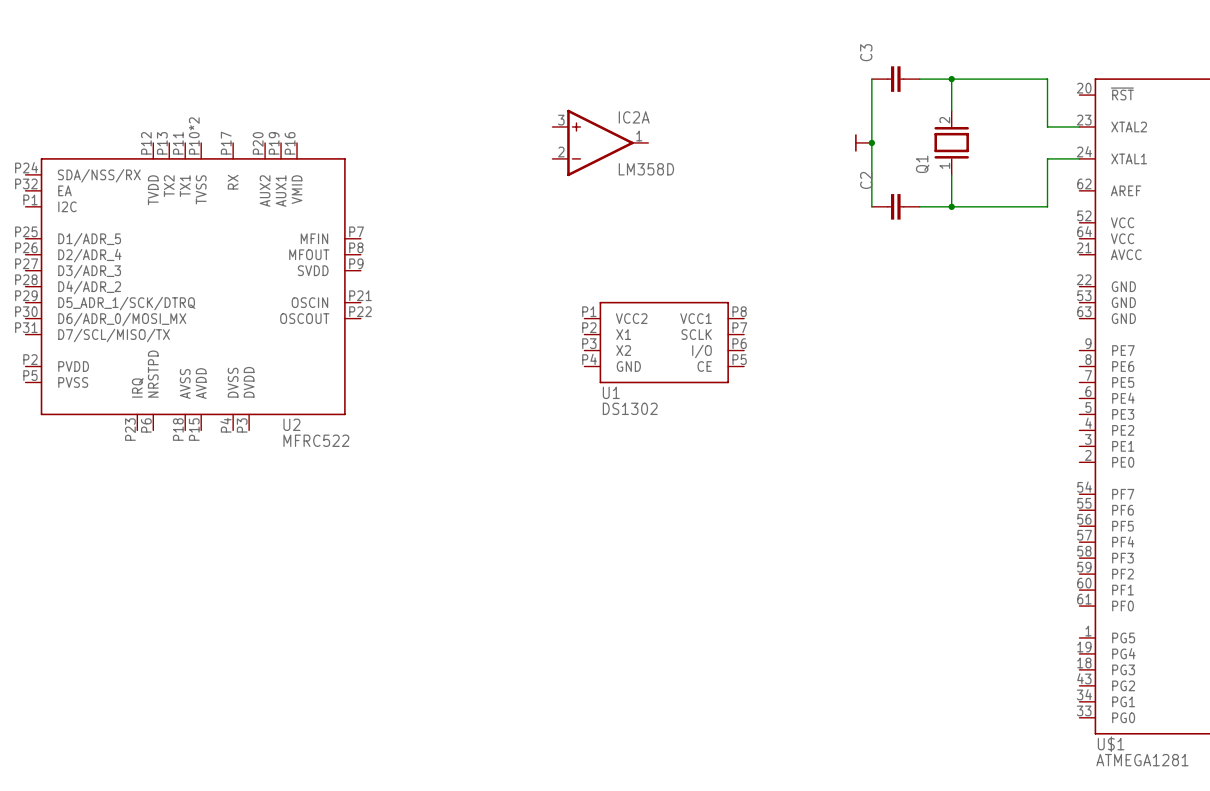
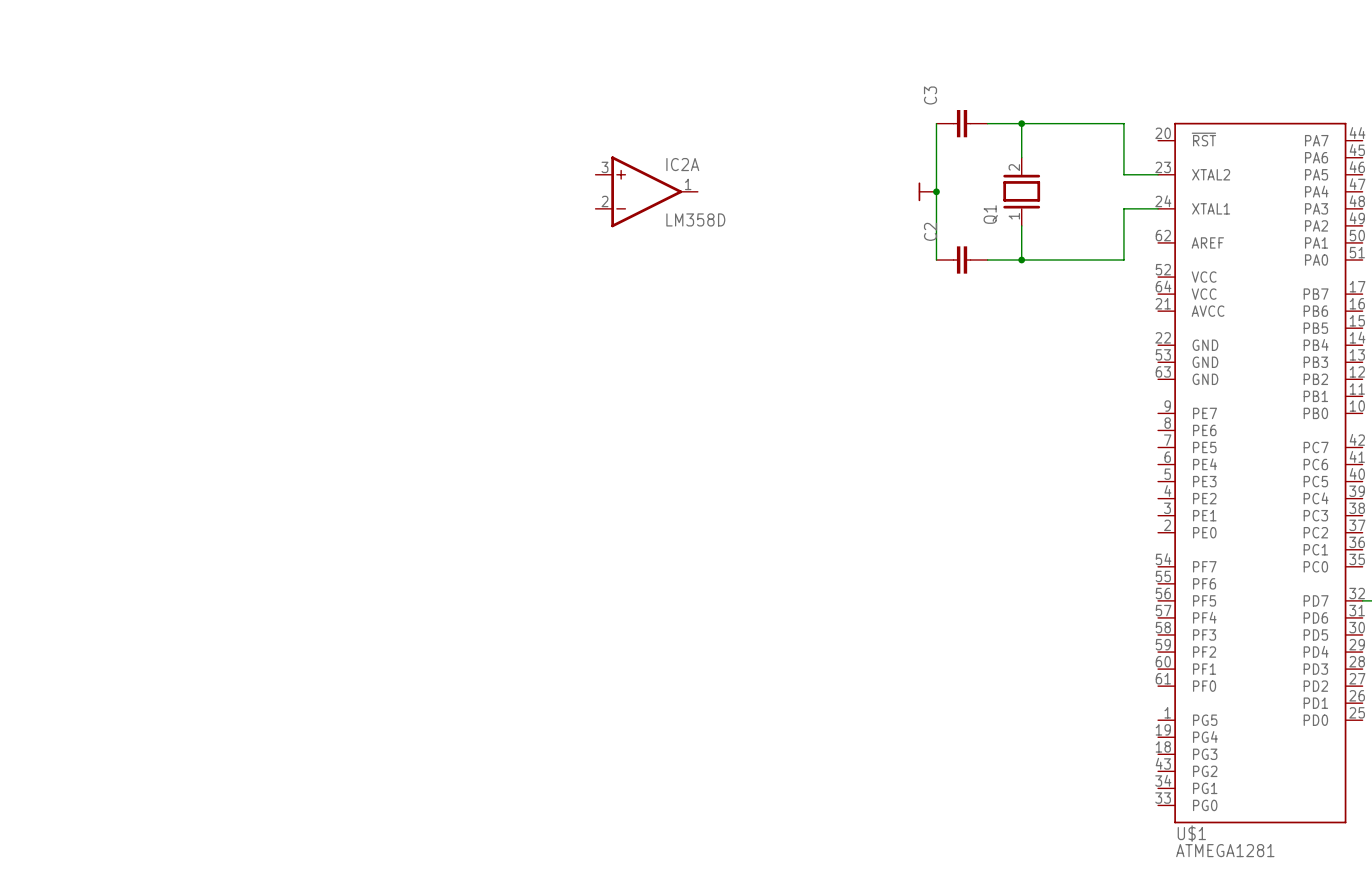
U2: MFRC522 (193, 286) -> none
U1: DS1302 (664, 342) -> none

